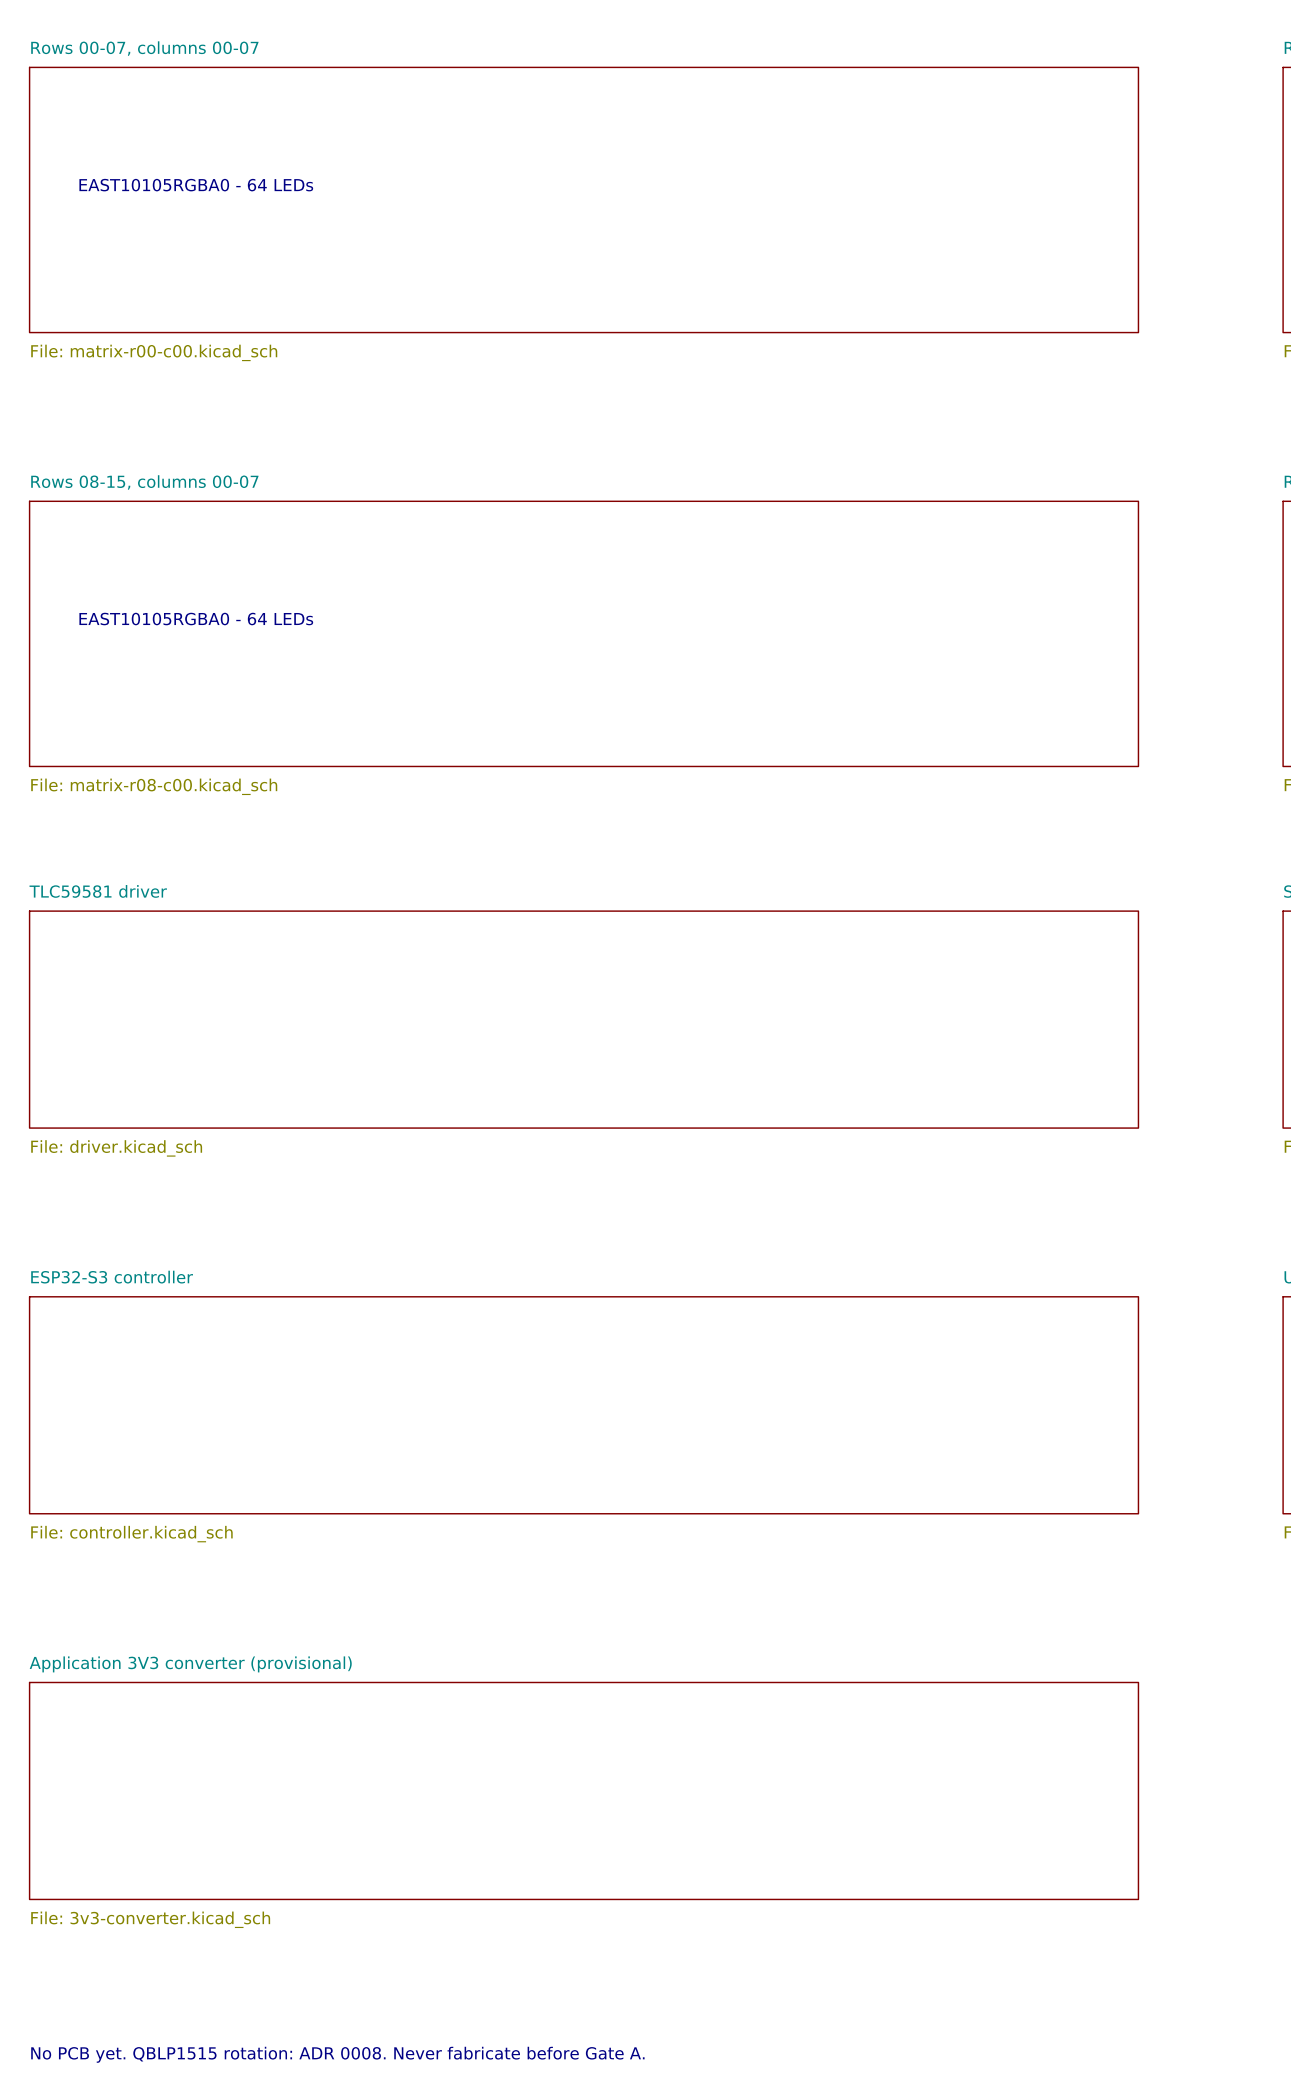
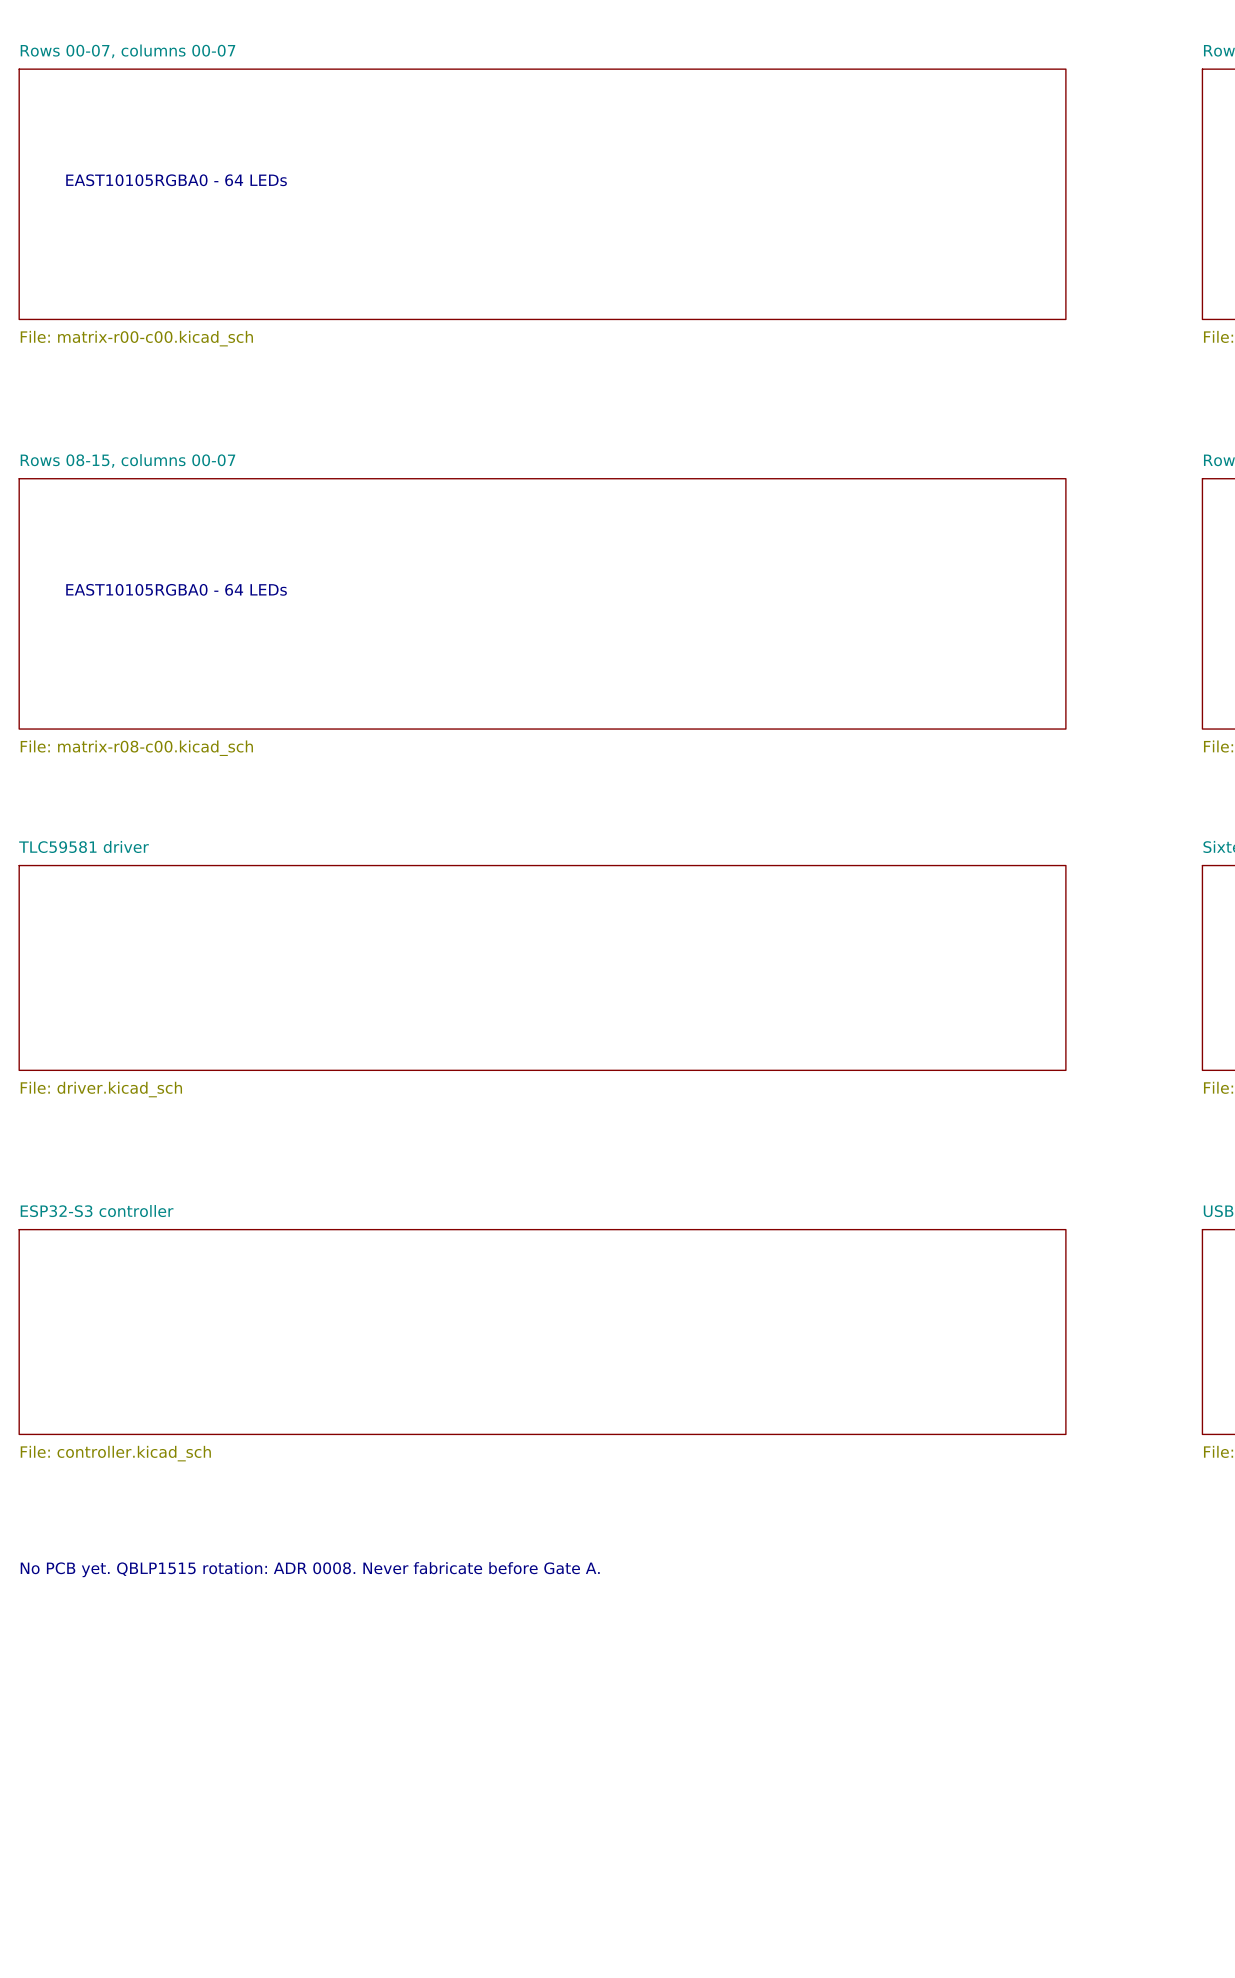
text: none -> No PCB yet. QBLP1515 rotation: ADR 0008. Never fabricate before Gate A. (310, 1569)
sheet Application 3V3 converter (provisional): File: 3v3-converter.kicad_sch (584, 1790) -> none
text: No PCB yet. QBLP1515 rotation: ADR 0008. Never fabricate before Gate A. (337, 2054) -> none

